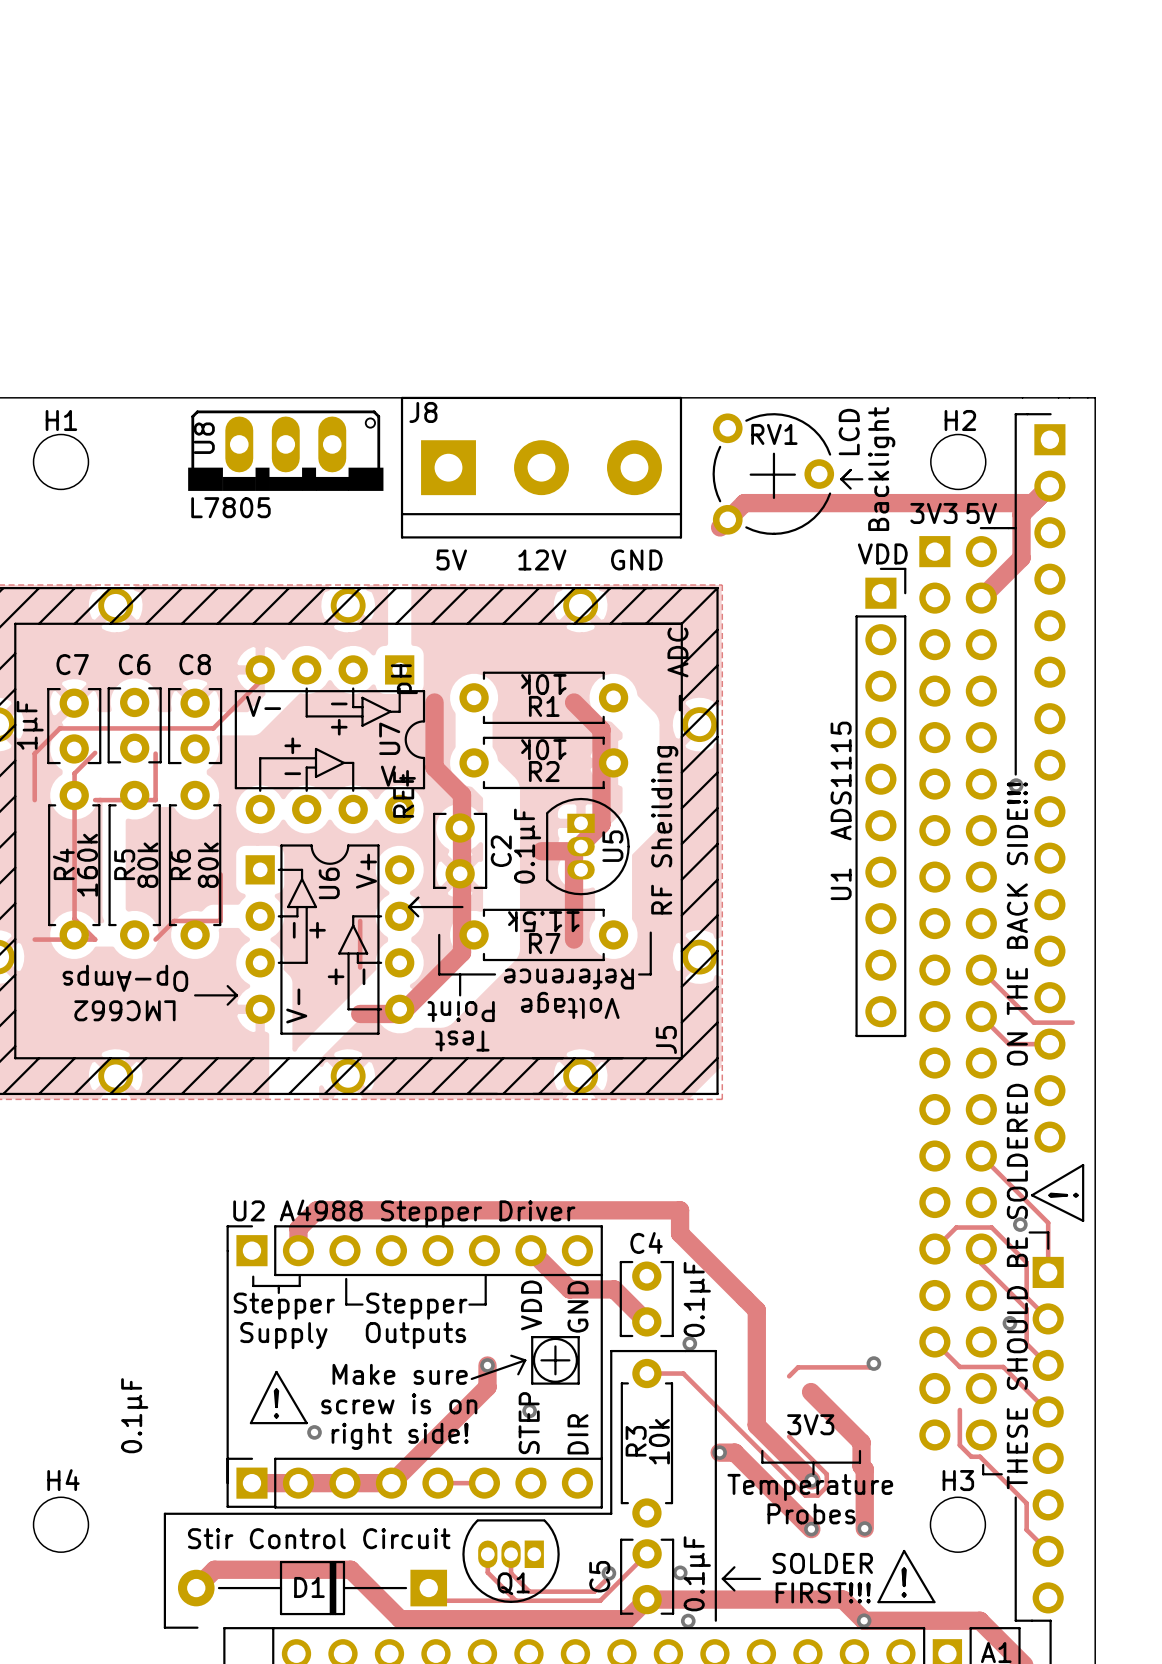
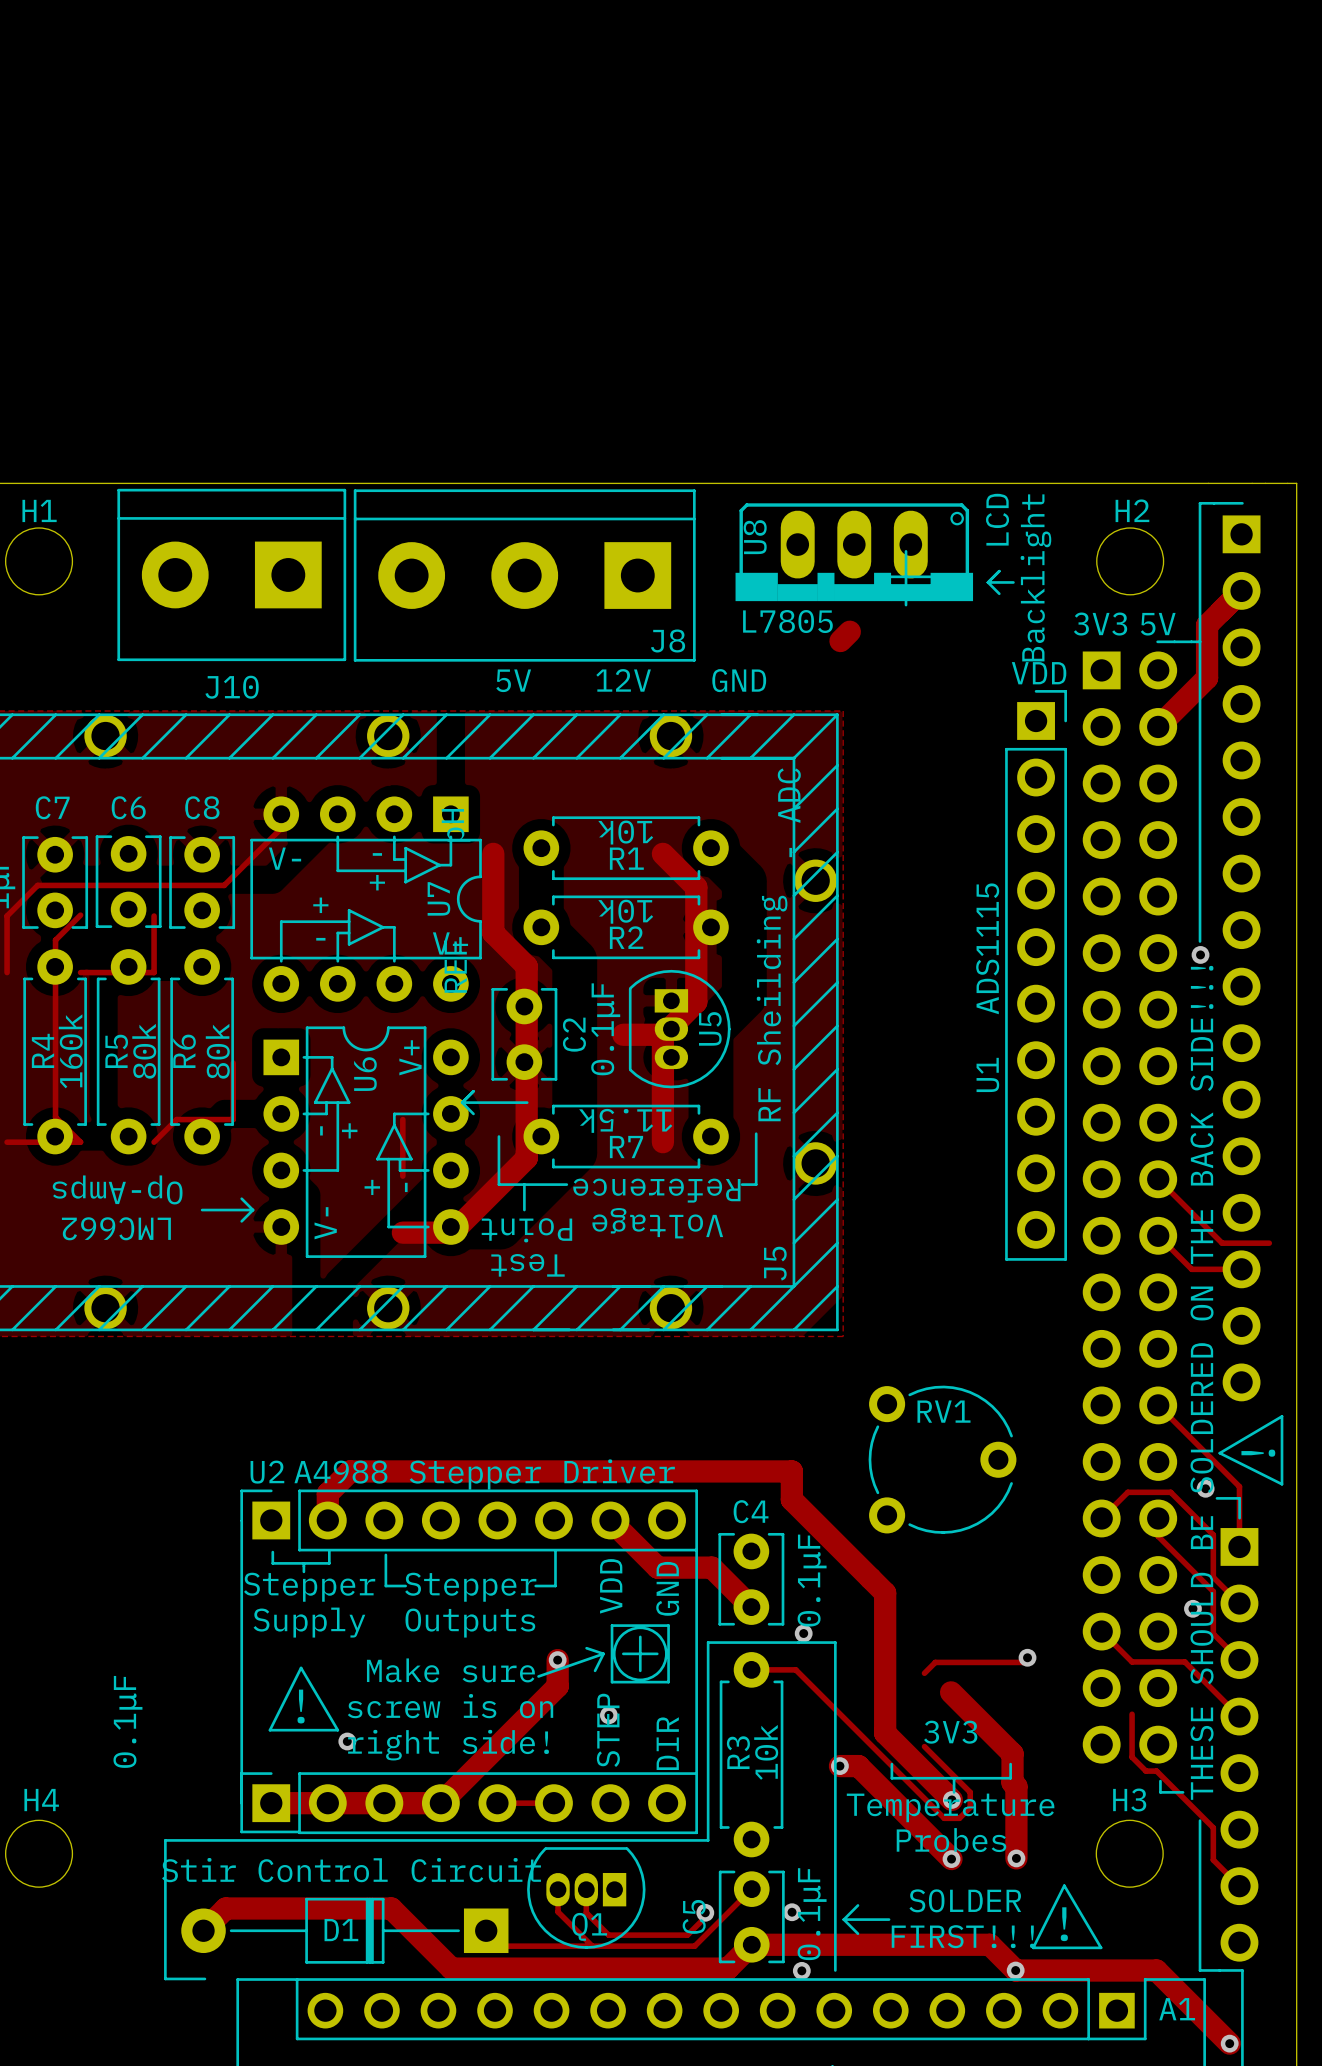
U8 position: (285, 450) -> (854, 552)
J8 rotation: 0° (541, 467) -> 180° (524, 575)
J10: none -> (231, 574)
RV1 position: (773, 474) -> (942, 1459)
track: (1033, 503) (744, 503) (727, 519) -> none

